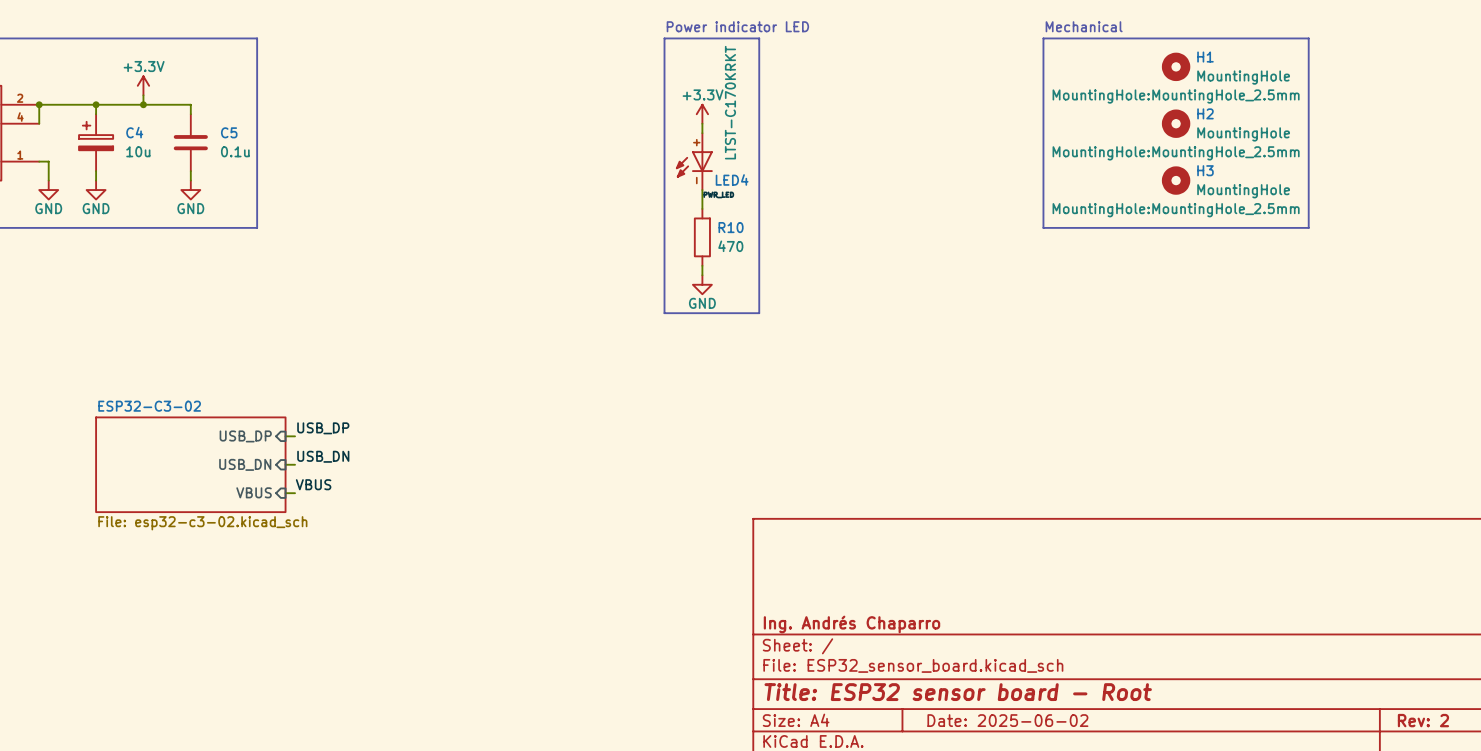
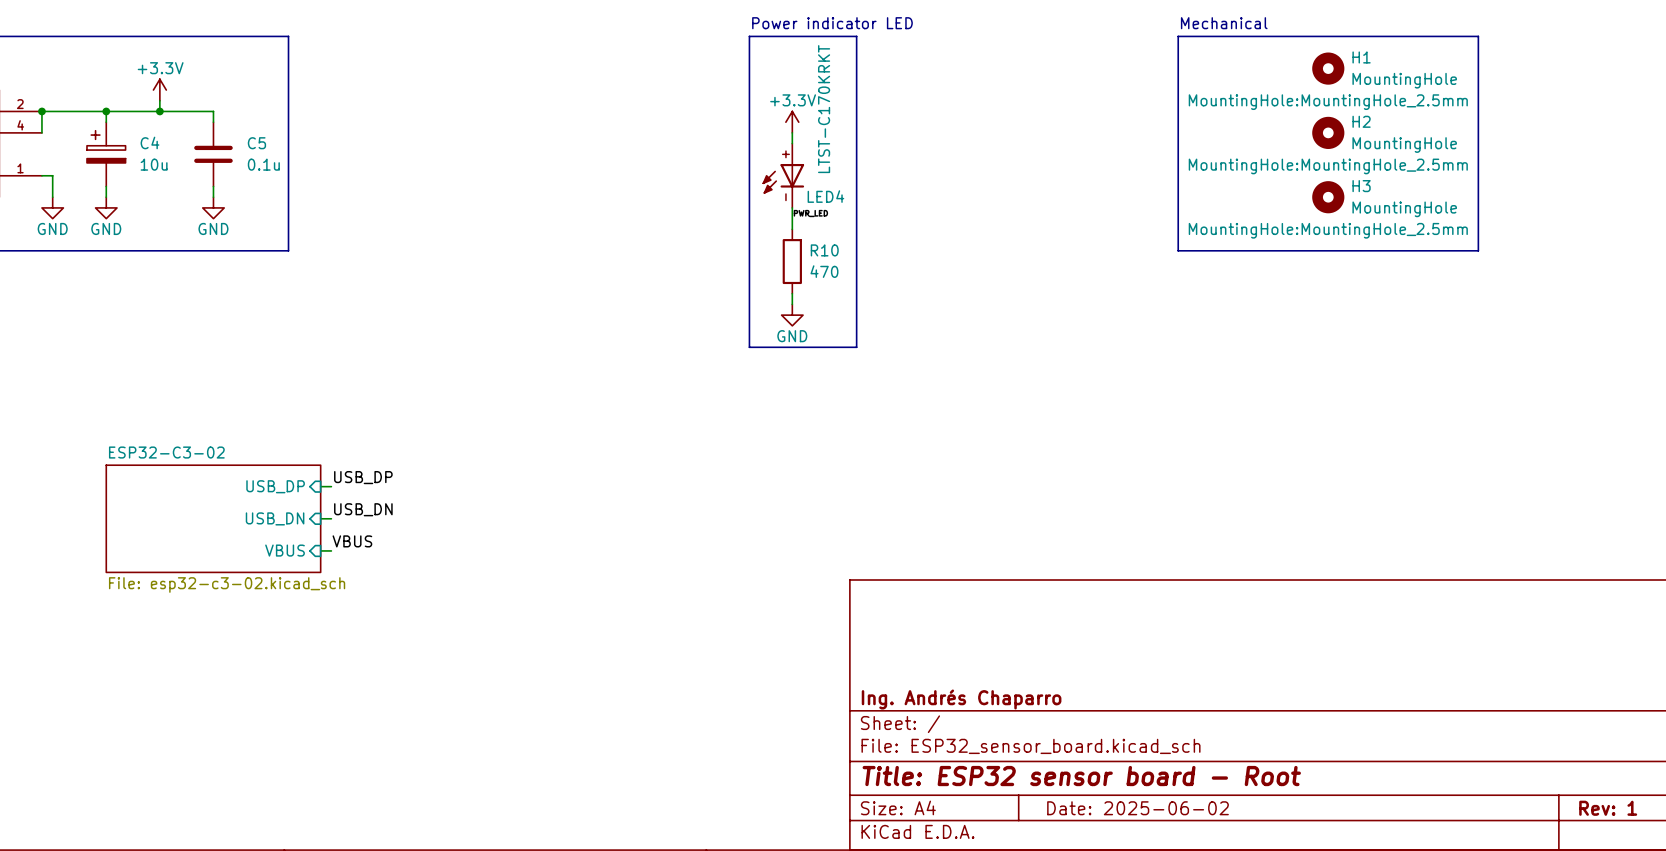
title block: Rev: 2 (1423, 720) -> Rev: 1 (1608, 808)

